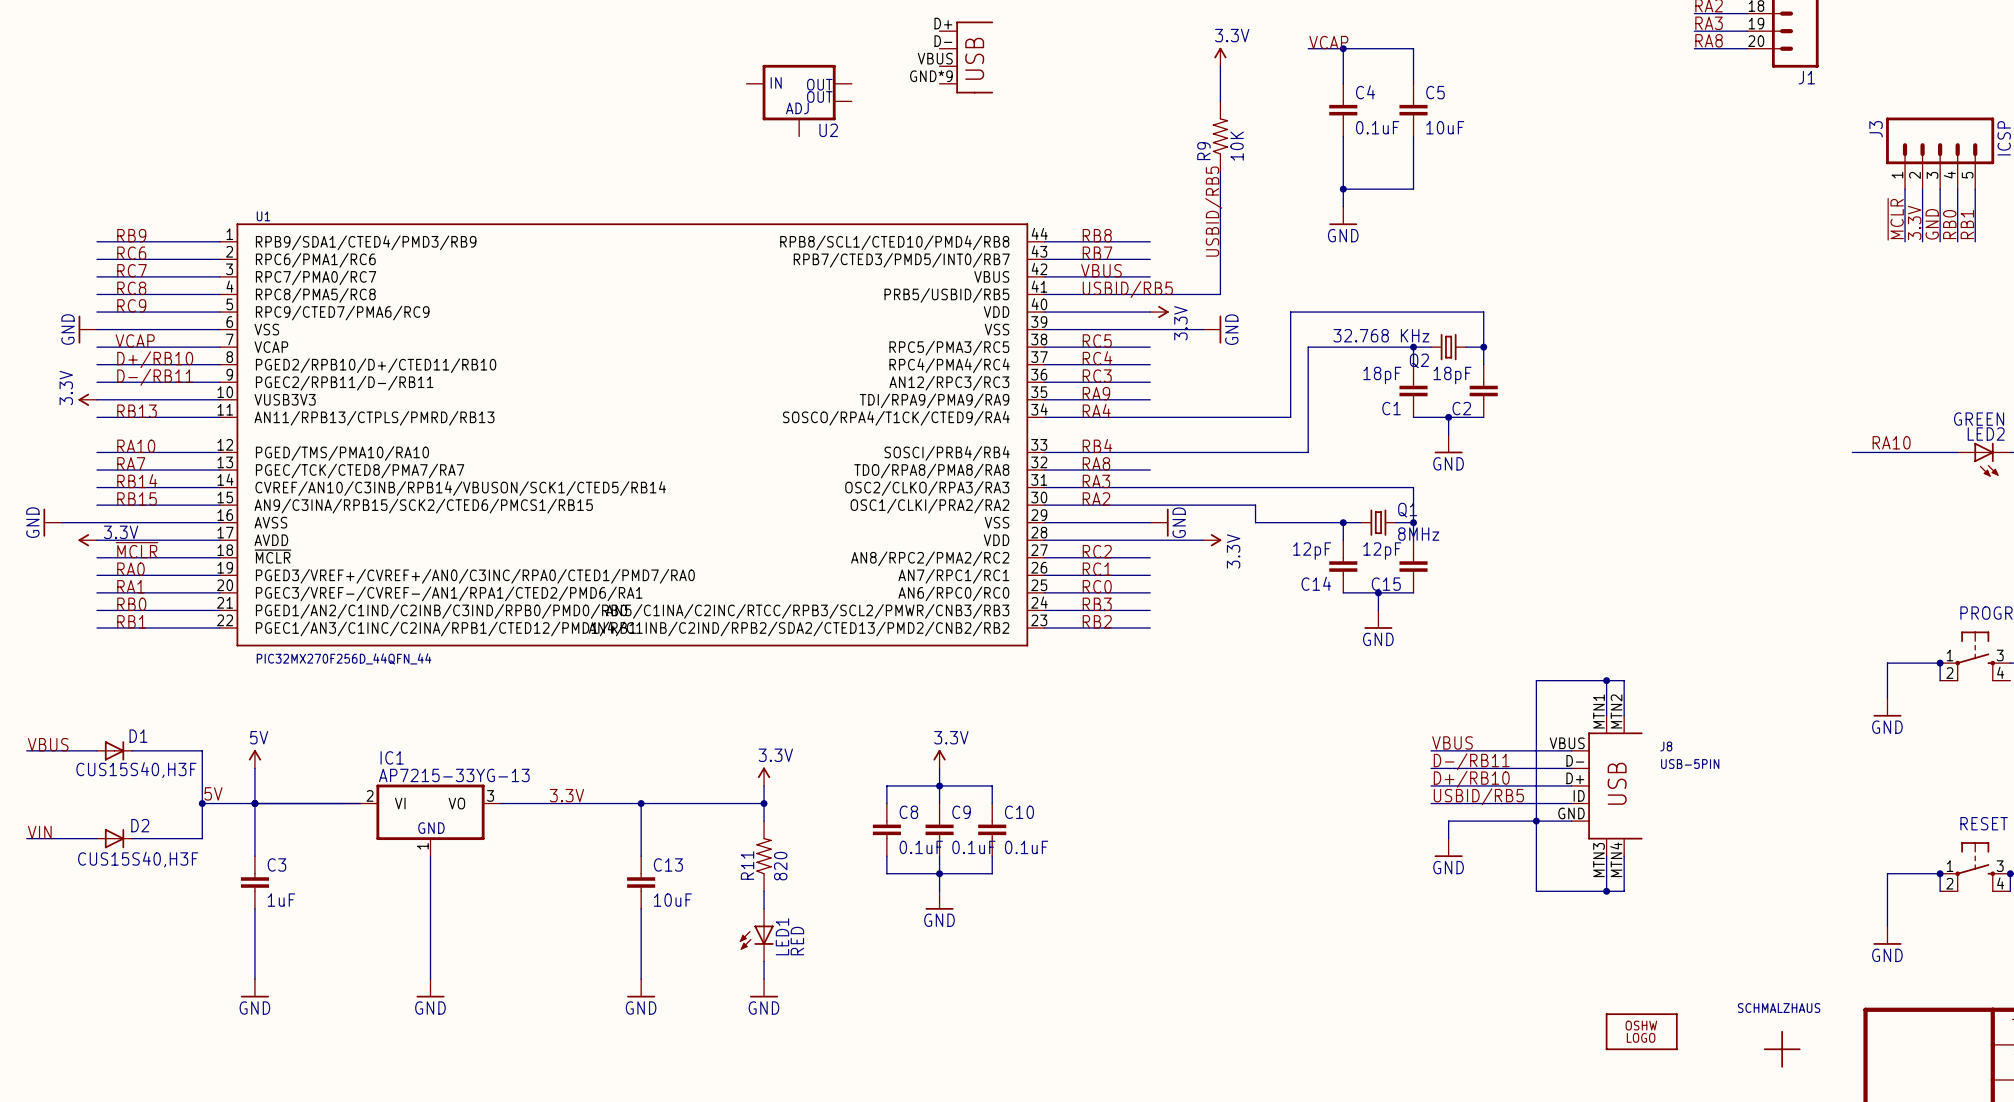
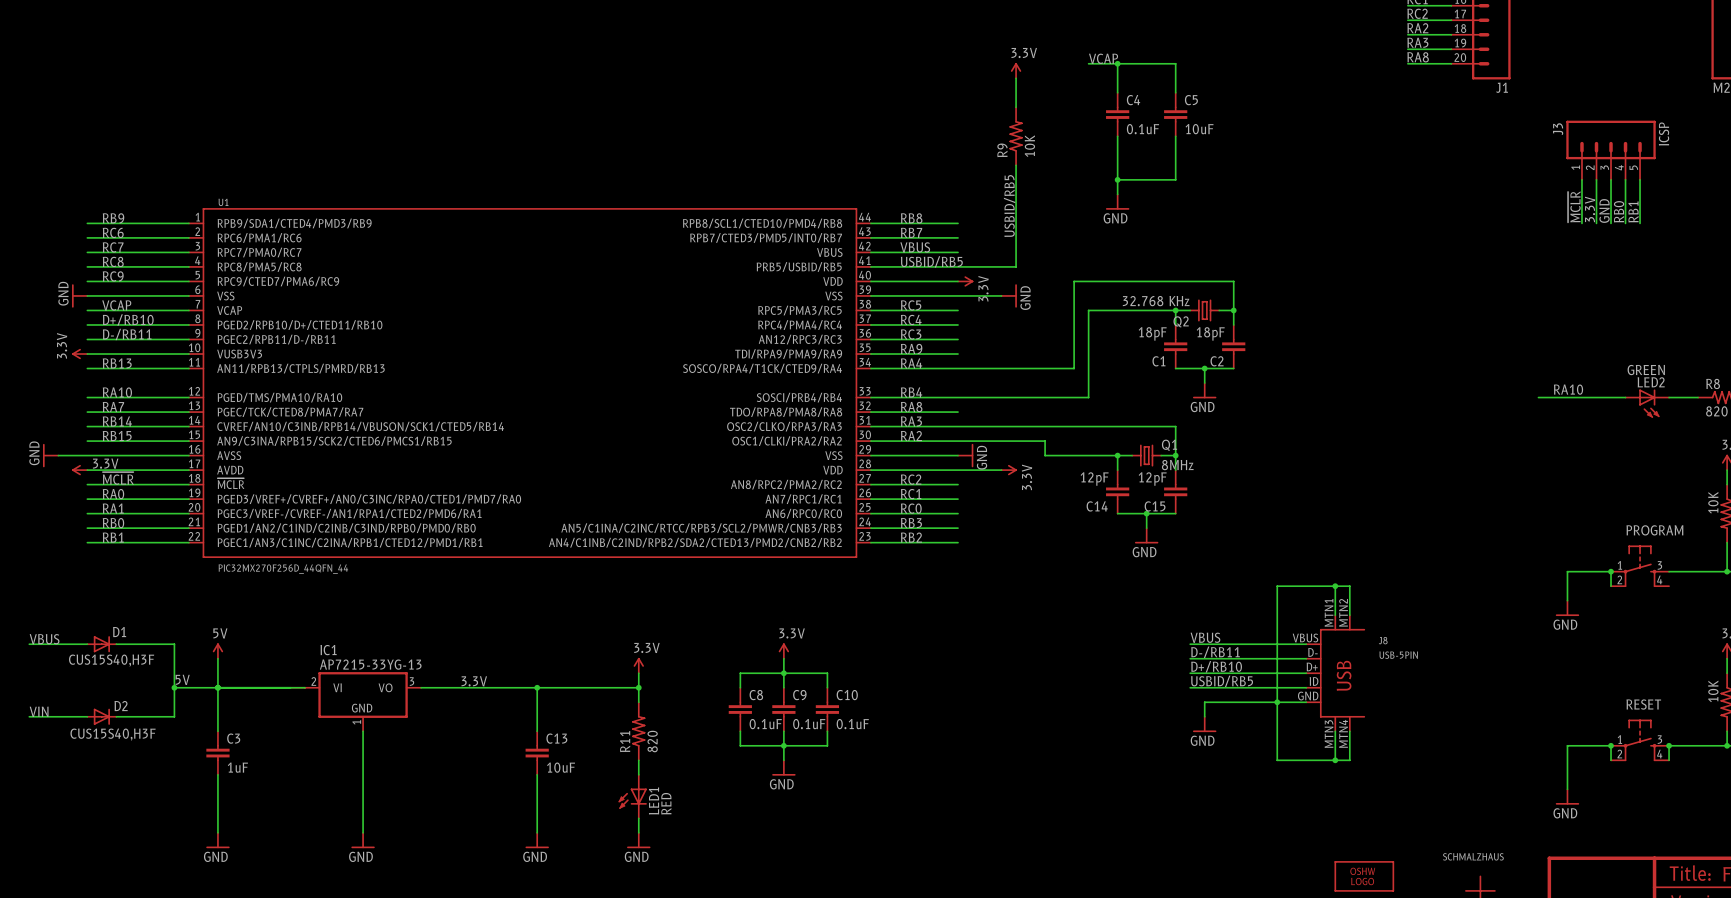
part: (966, 57) -> none
U2: (799, 100) -> none

